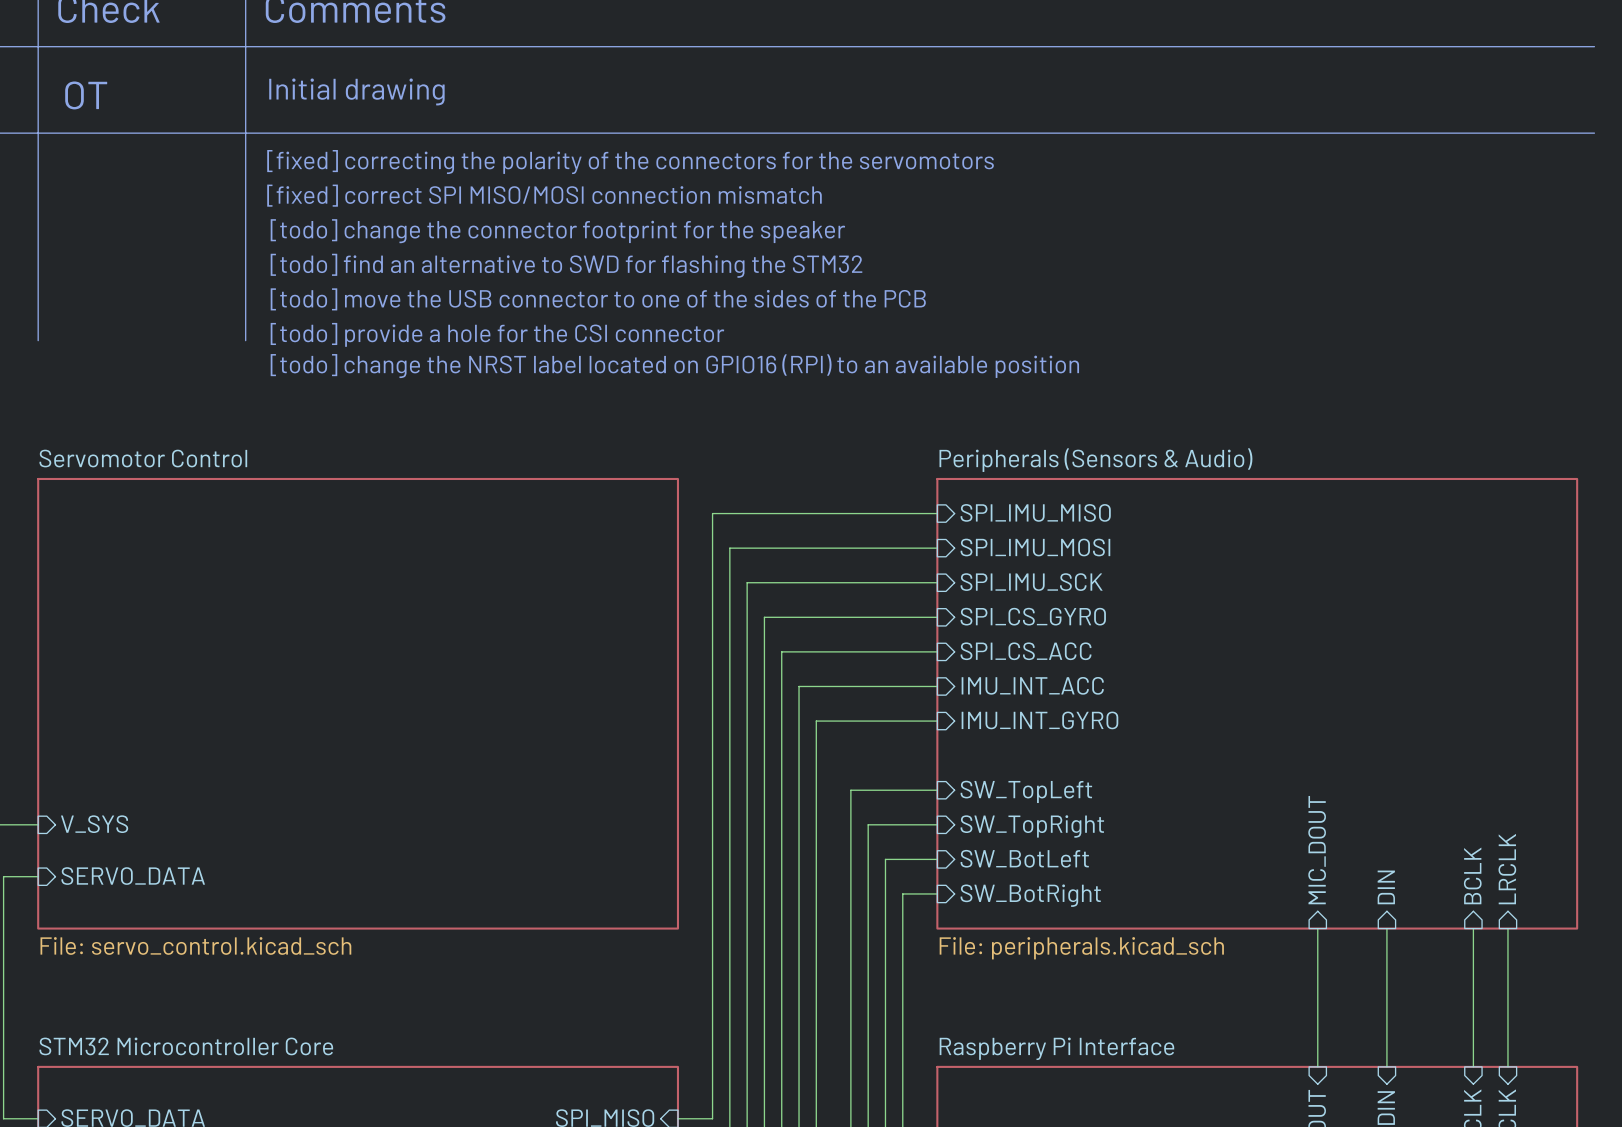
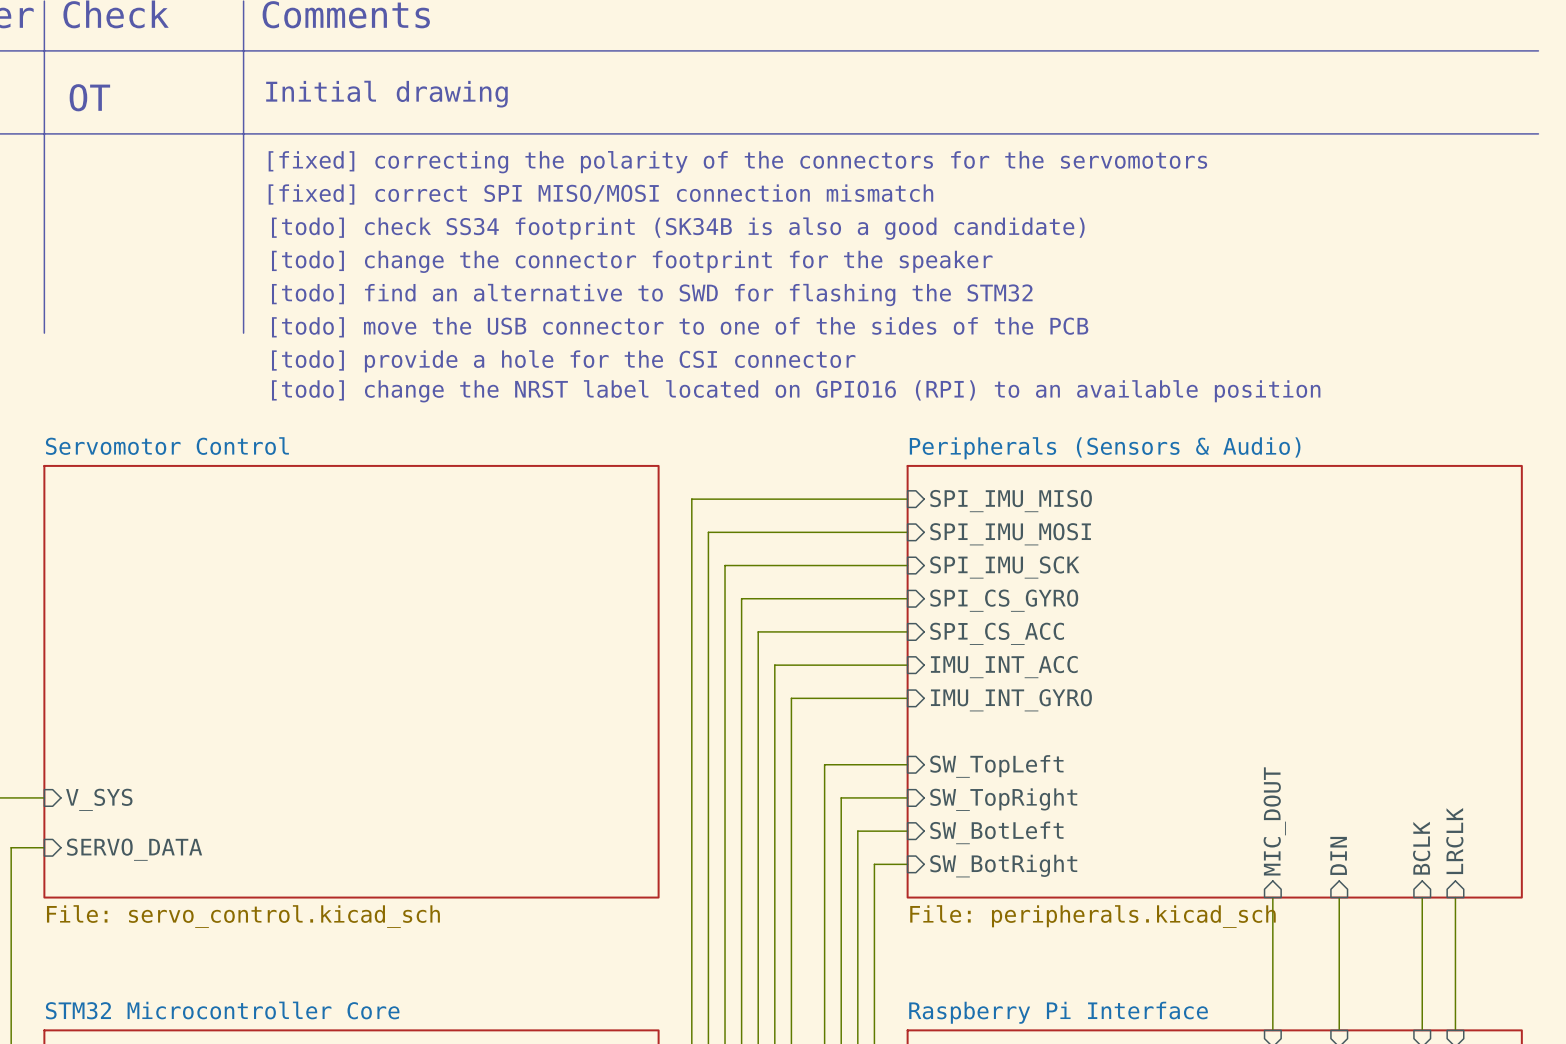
text: [todo] change the connector footprint for the speaker (557, 231) -> [todo] check SS34 footprint (SK34B is also a good candidate) (678, 228)
text: [todo] find an alternative to SWD for flashing the STM32 (566, 265) -> [todo] change the connector footprint for the speaker (632, 261)
text: [todo] move the USB connector to one of the sides of the PCB (598, 299) -> [todo] find an alternative to SWD for flashing the STM32 (652, 295)
text: [todo] provide a hole for the CSI connector (497, 334) -> [todo] move the USB connector to one of the sides of the PCB (680, 327)
text position: [todo] change the NRST label located on GPIO16 (RPI) to an available position (674, 366) -> [todo] change the NRST label located on GPIO16 (RPI) to an available position (796, 391)
text: none -> [todo] provide a hole for the CSI connector (563, 361)

